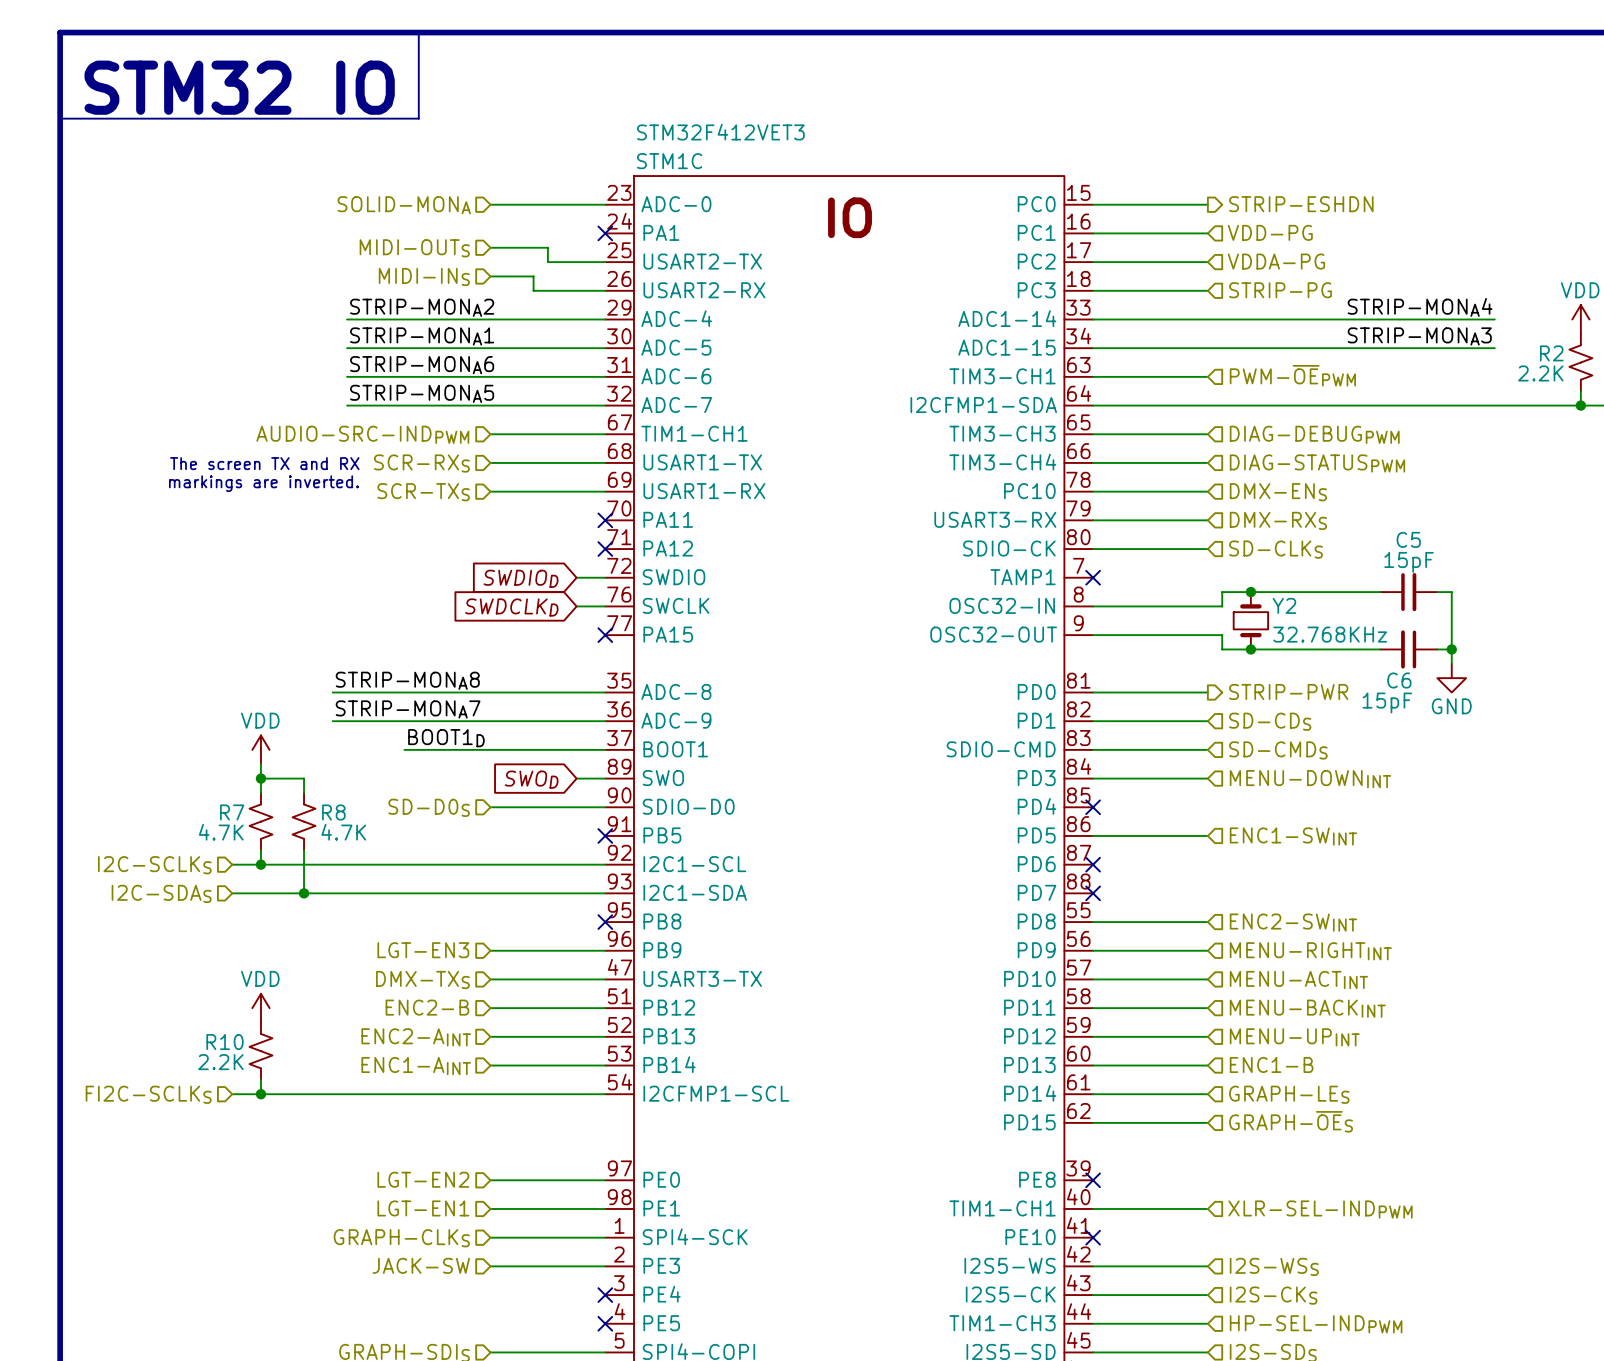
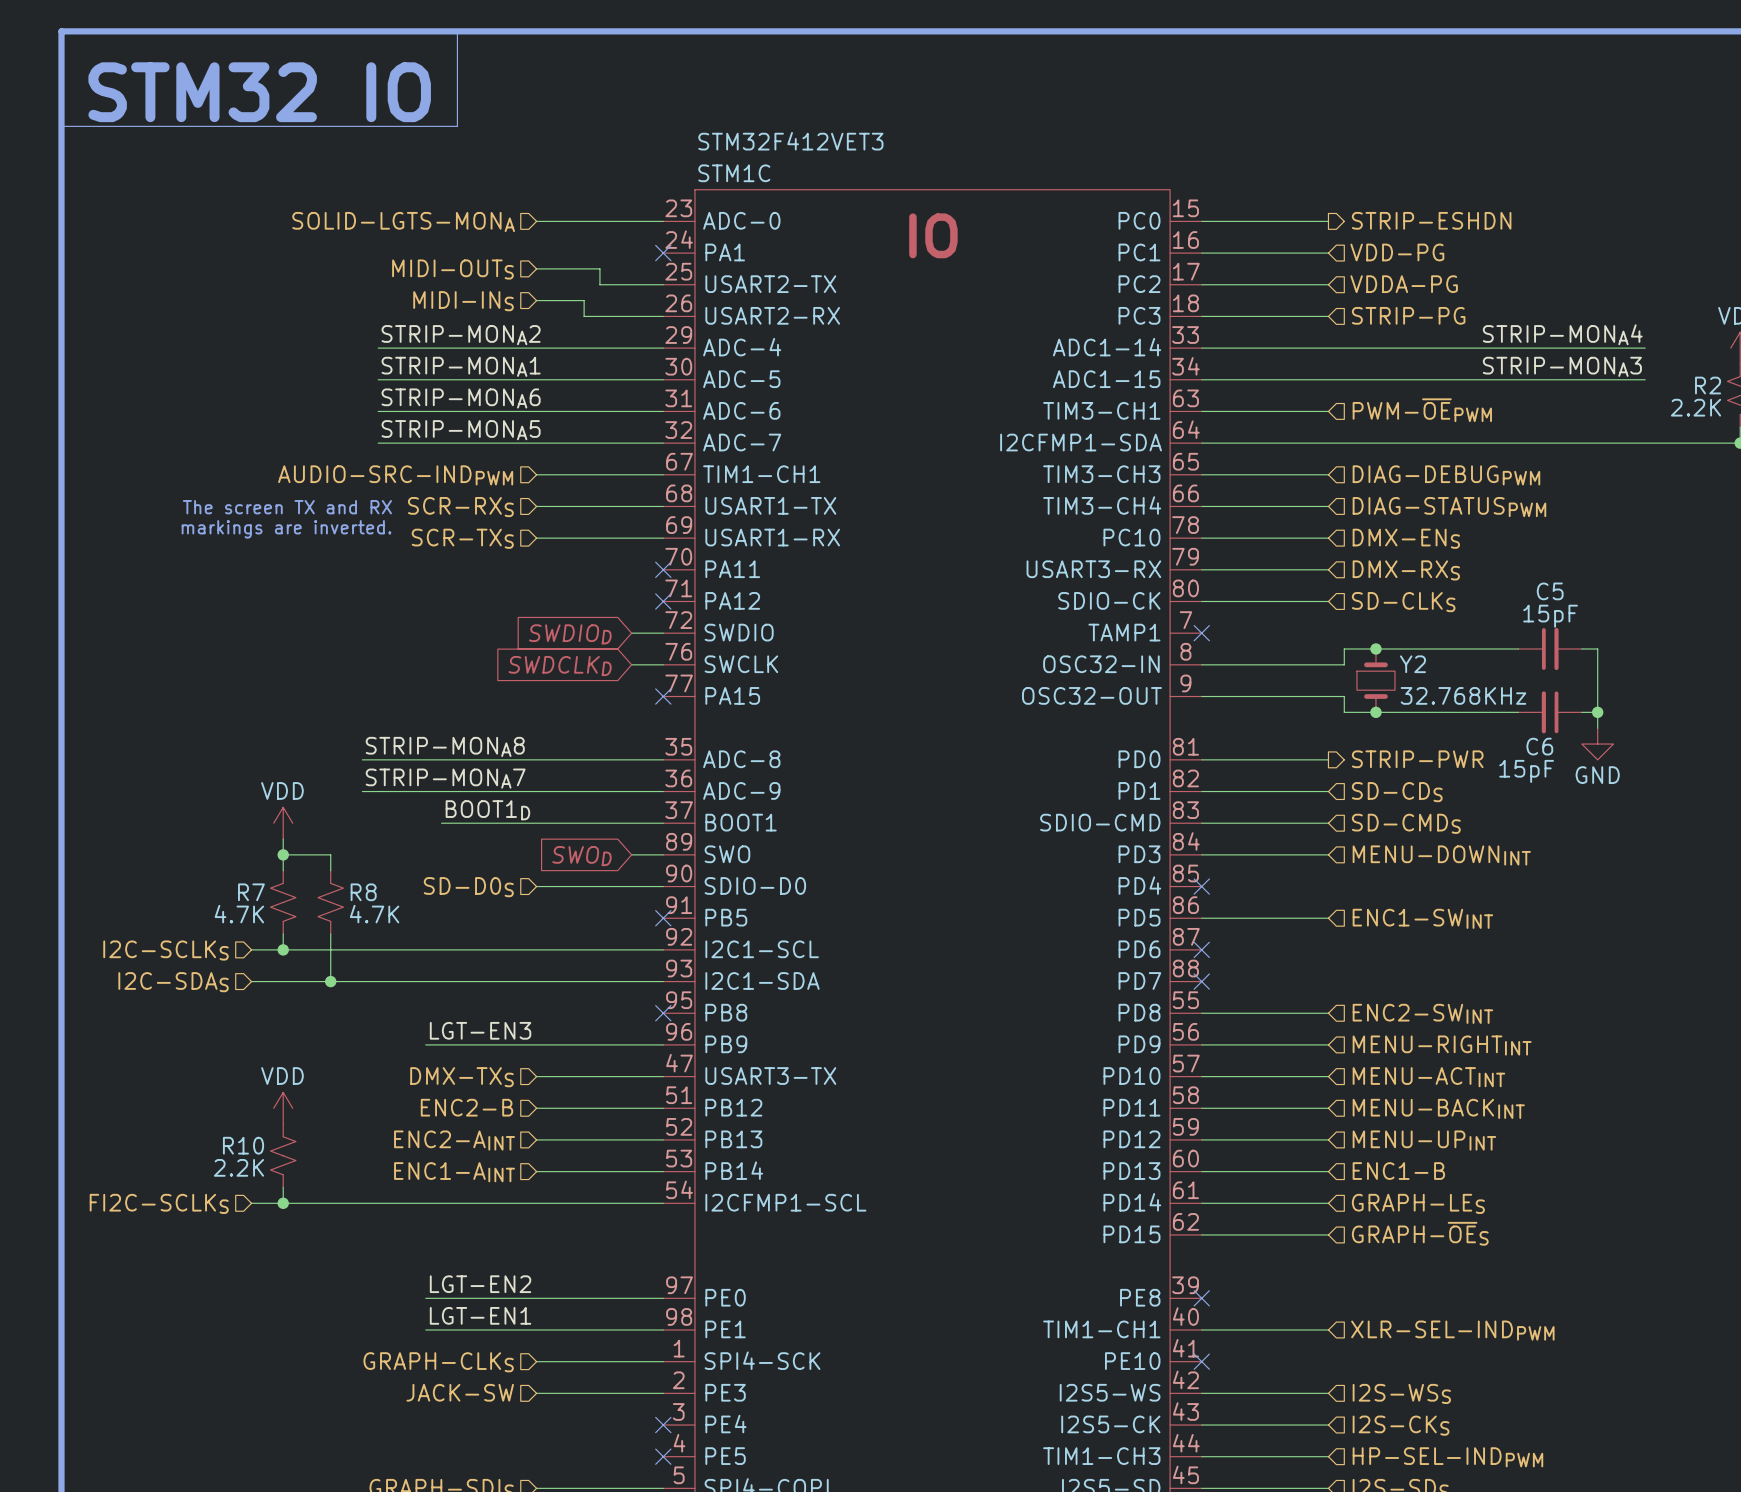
hierarchical label: SOLID-MONA (404, 205) -> SOLID-LGTS-MONA (403, 221)
label: none -> LGT-EN3 (480, 1030)
wire: none -> (425, 1044) (536, 1044)
hierarchical label: LGT-EN3 (423, 950) -> none
label: none -> LGT-EN2 (480, 1284)
hierarchical label: LGT-EN2 (423, 1179) -> none
wire: none -> (425, 1298) (536, 1298)
label: none -> LGT-EN1 (480, 1315)
wire: none -> (425, 1329) (536, 1329)
hierarchical label: LGT-EN1 (423, 1208) -> none

